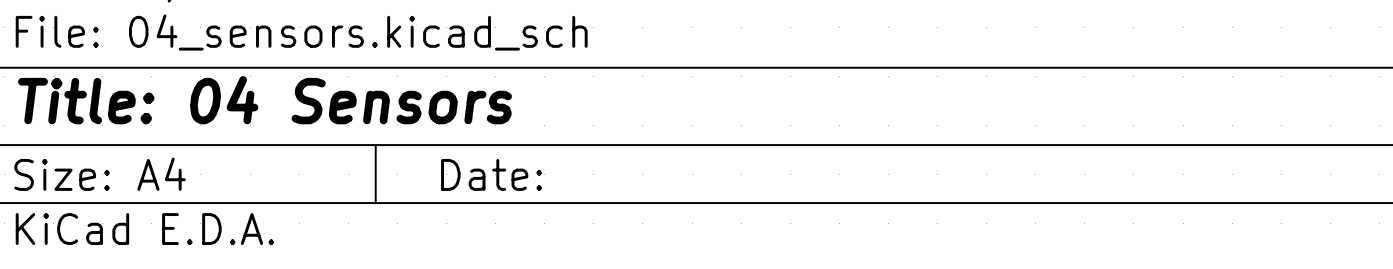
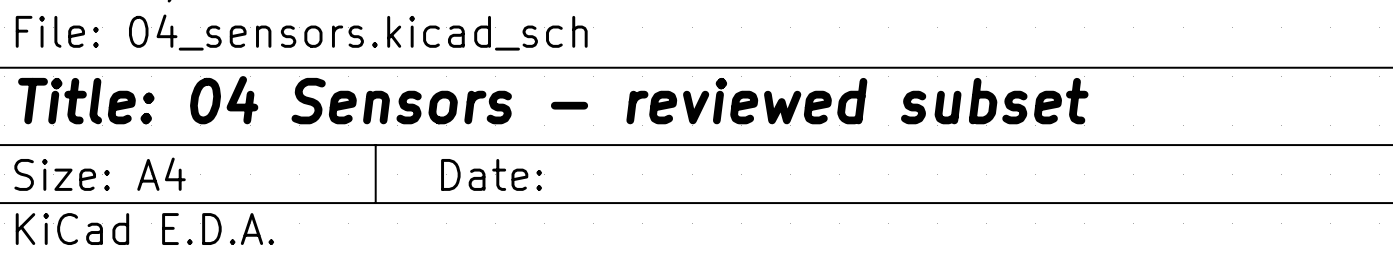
title block: Title: 04 Sensors (265, 100) -> Title: 04 Sensors - reviewed subset (553, 100)

